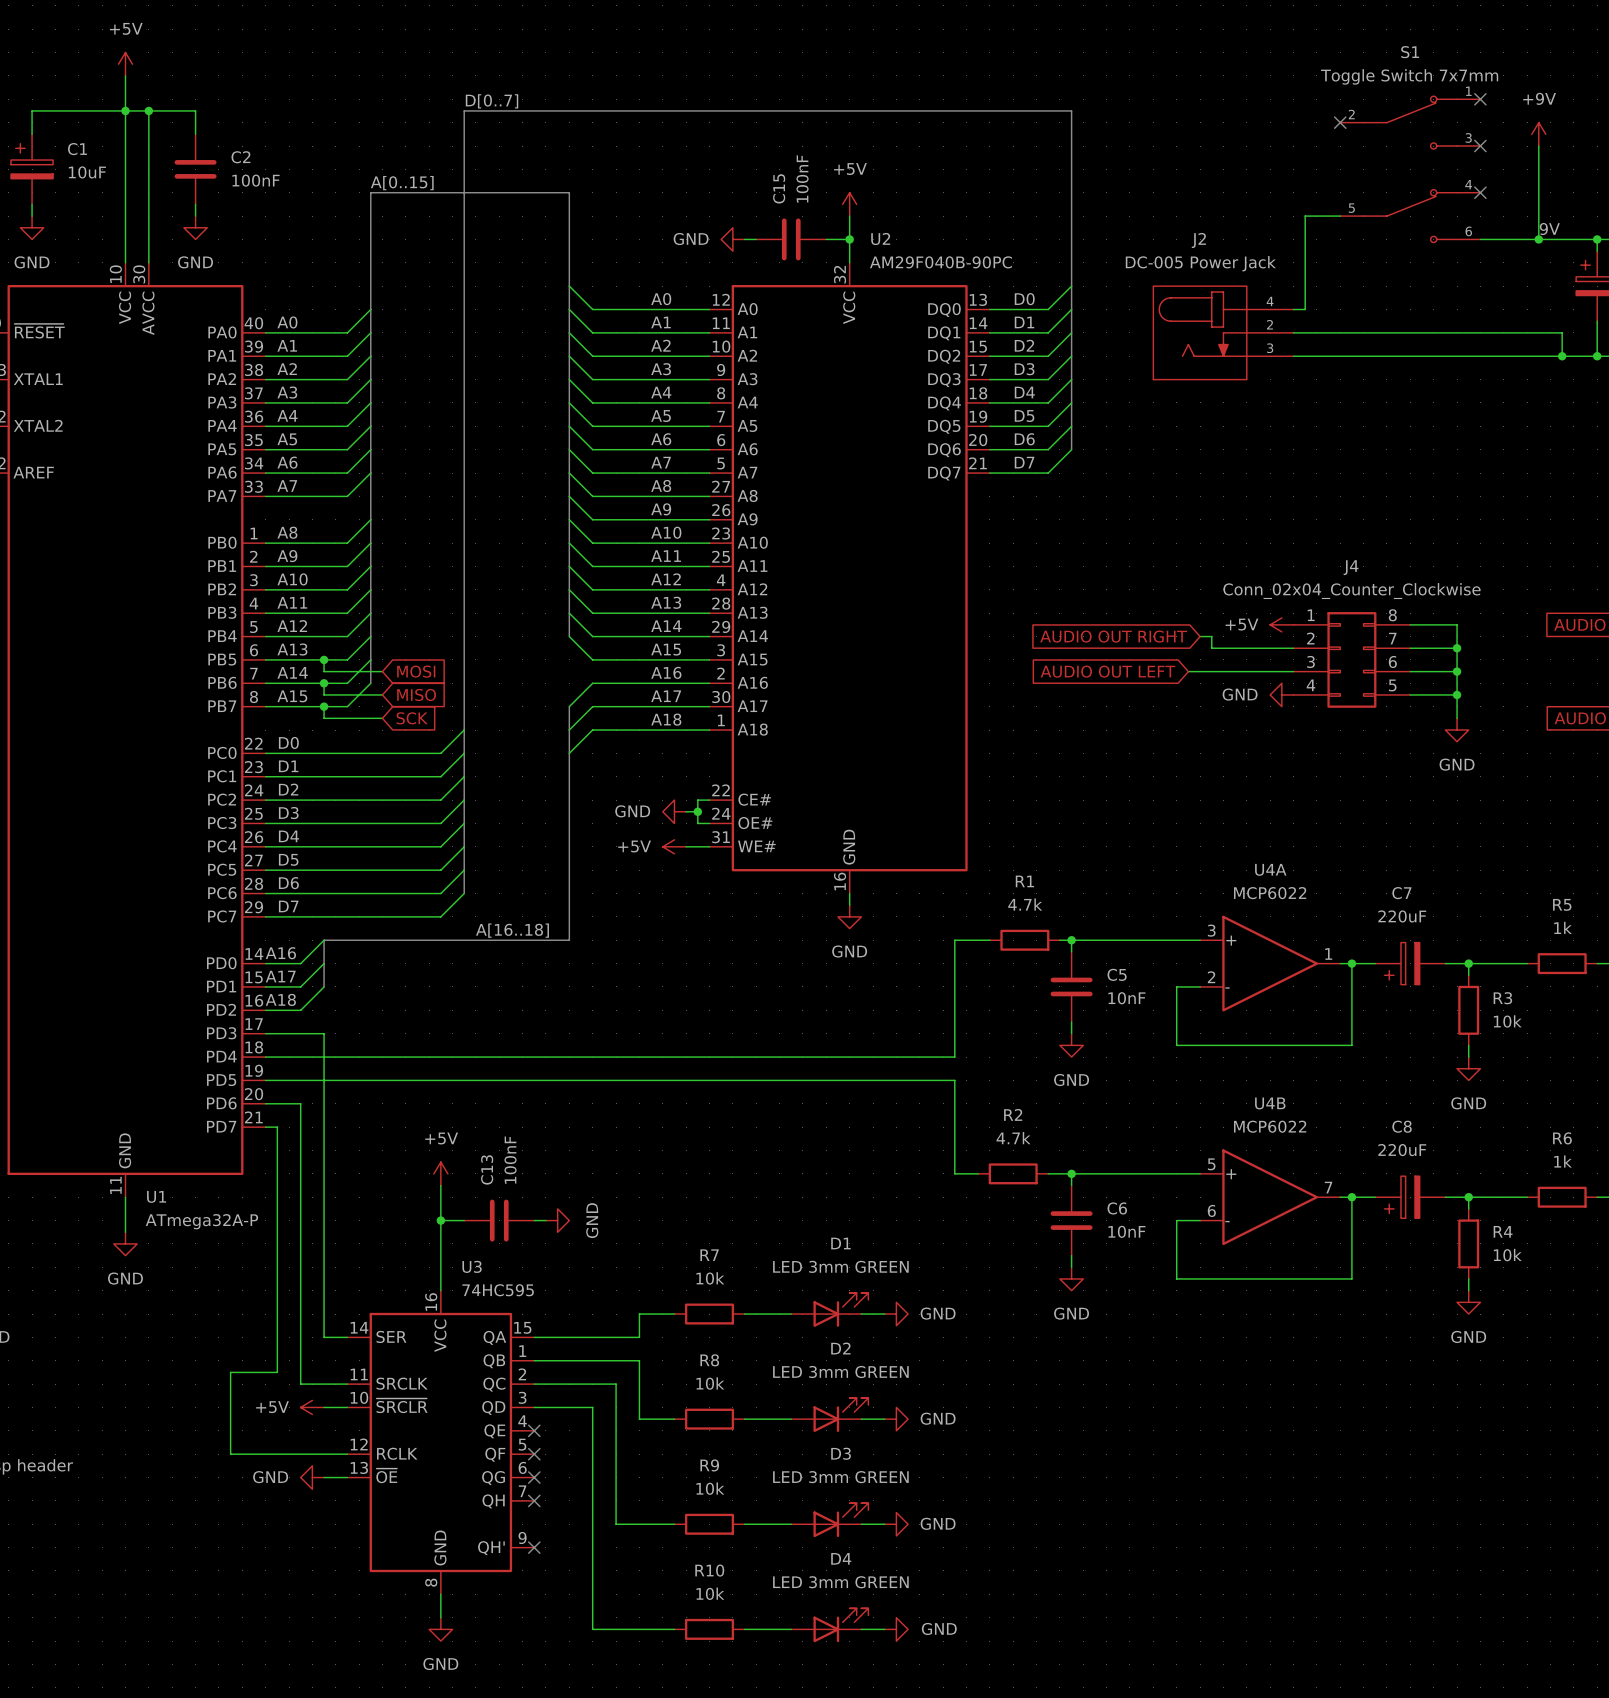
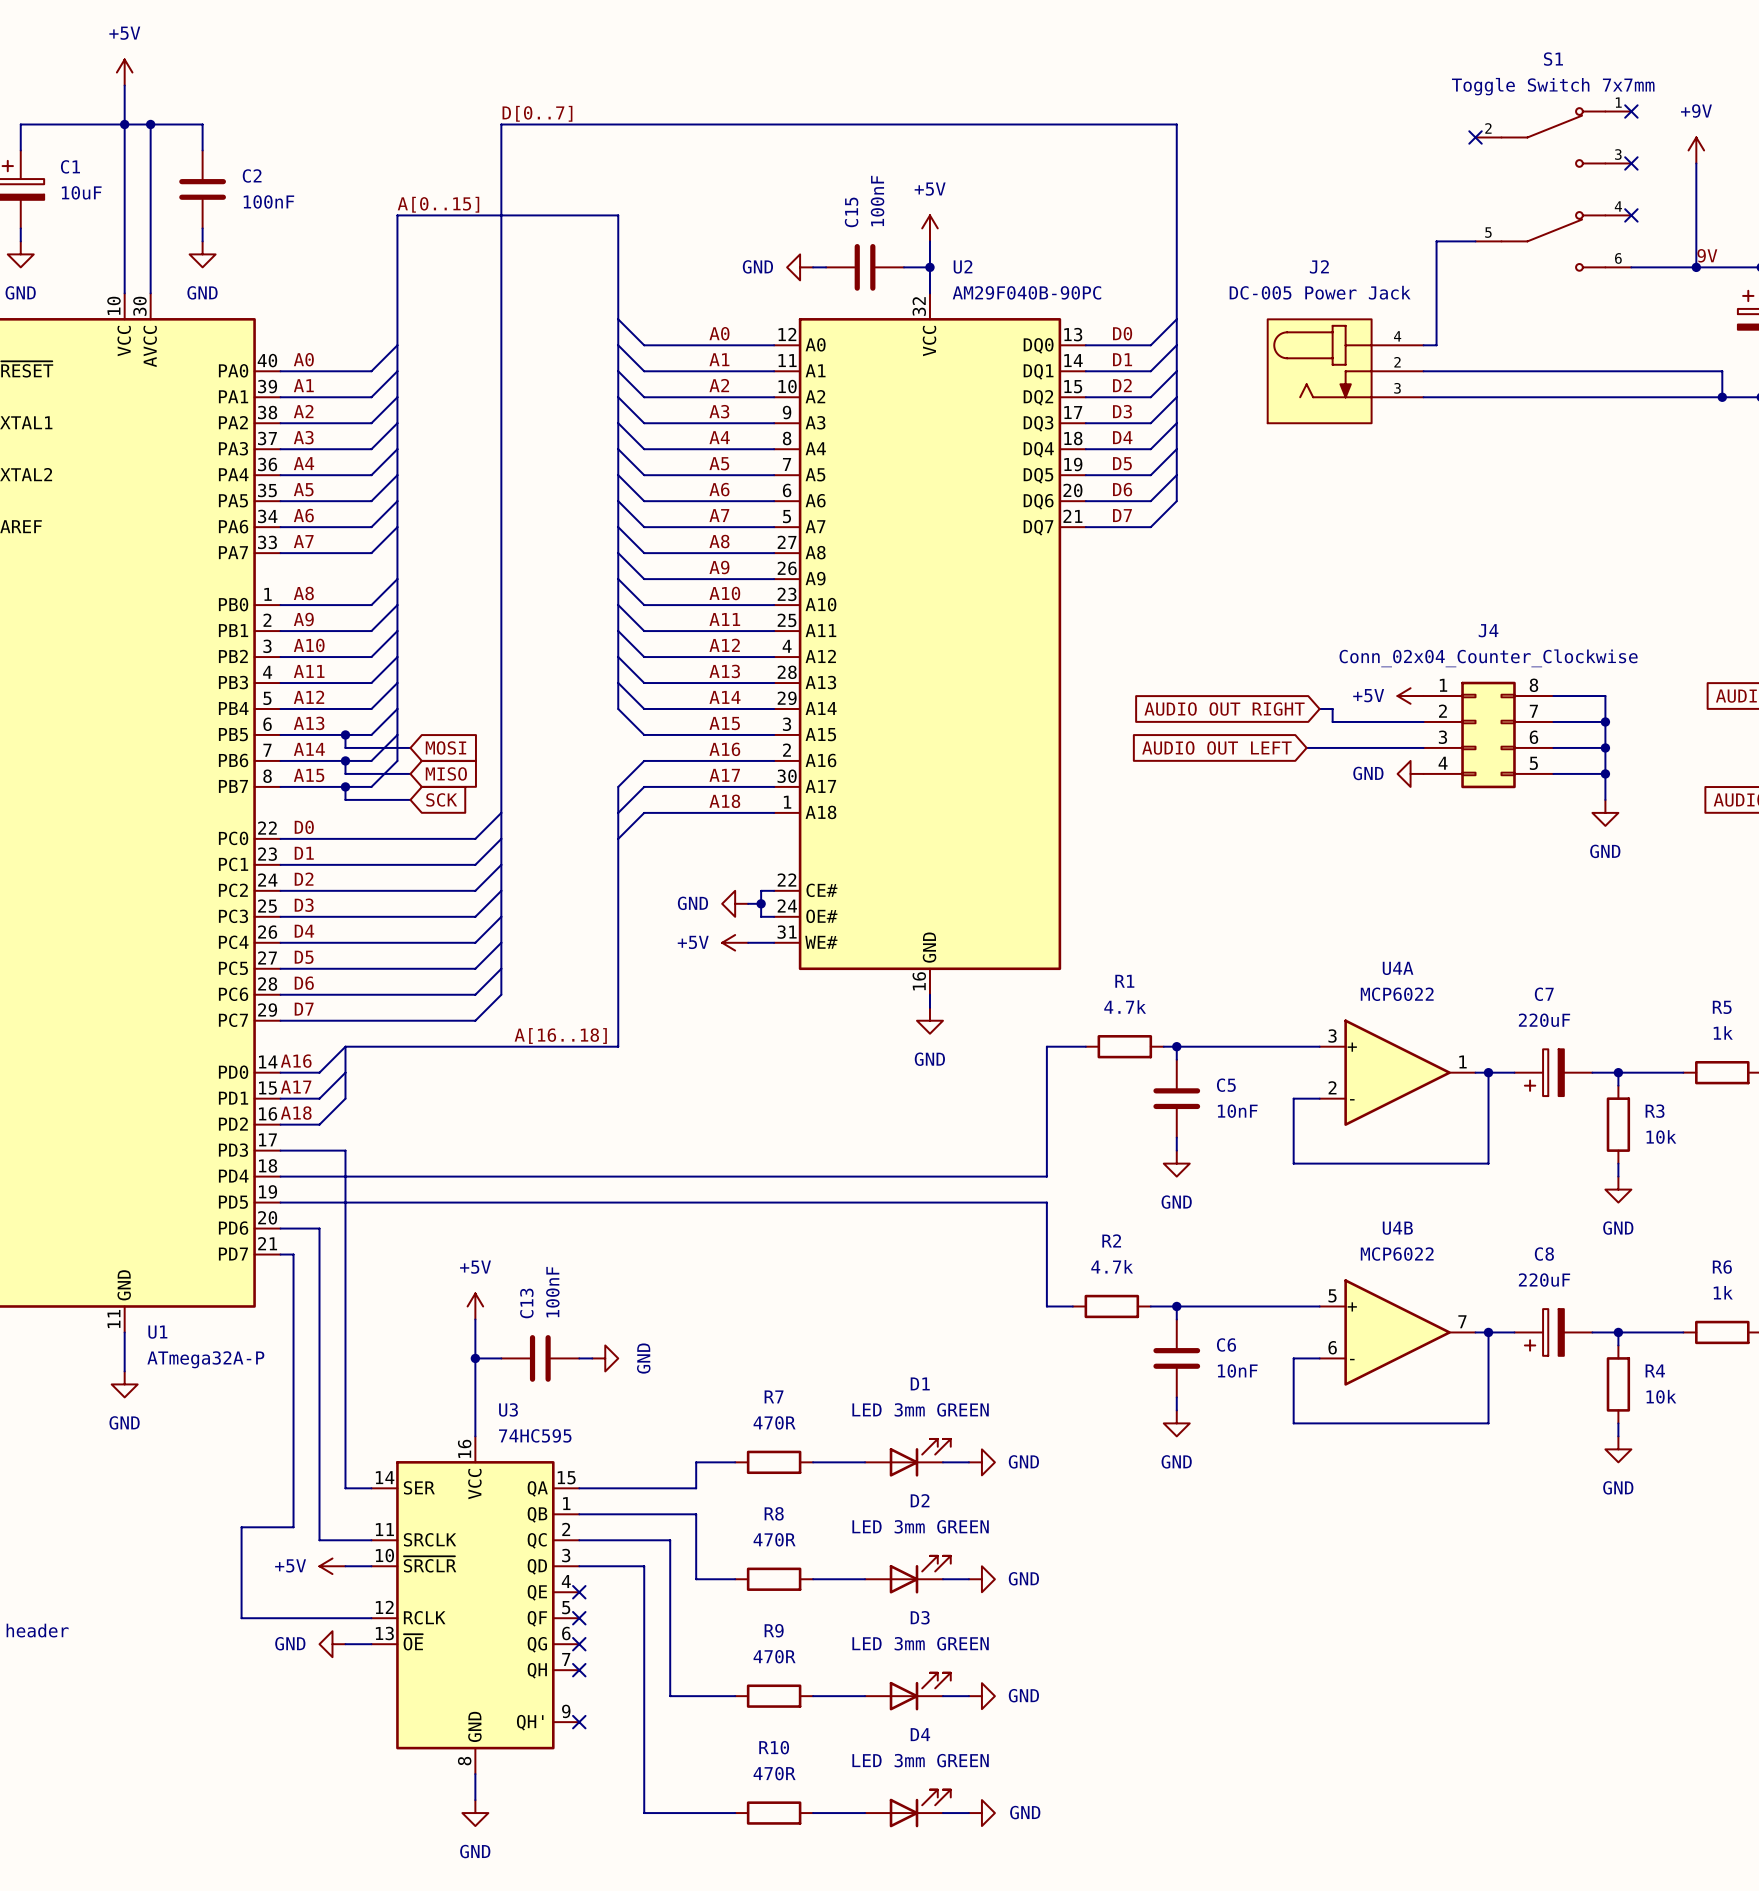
R7 value: 10k (710, 1278) -> 470R (774, 1422)
R8 value: 10k (710, 1383) -> 470R (774, 1539)
R9 value: 10k (710, 1488) -> 470R (774, 1656)
R10 value: 10k (710, 1593) -> 470R (774, 1773)

